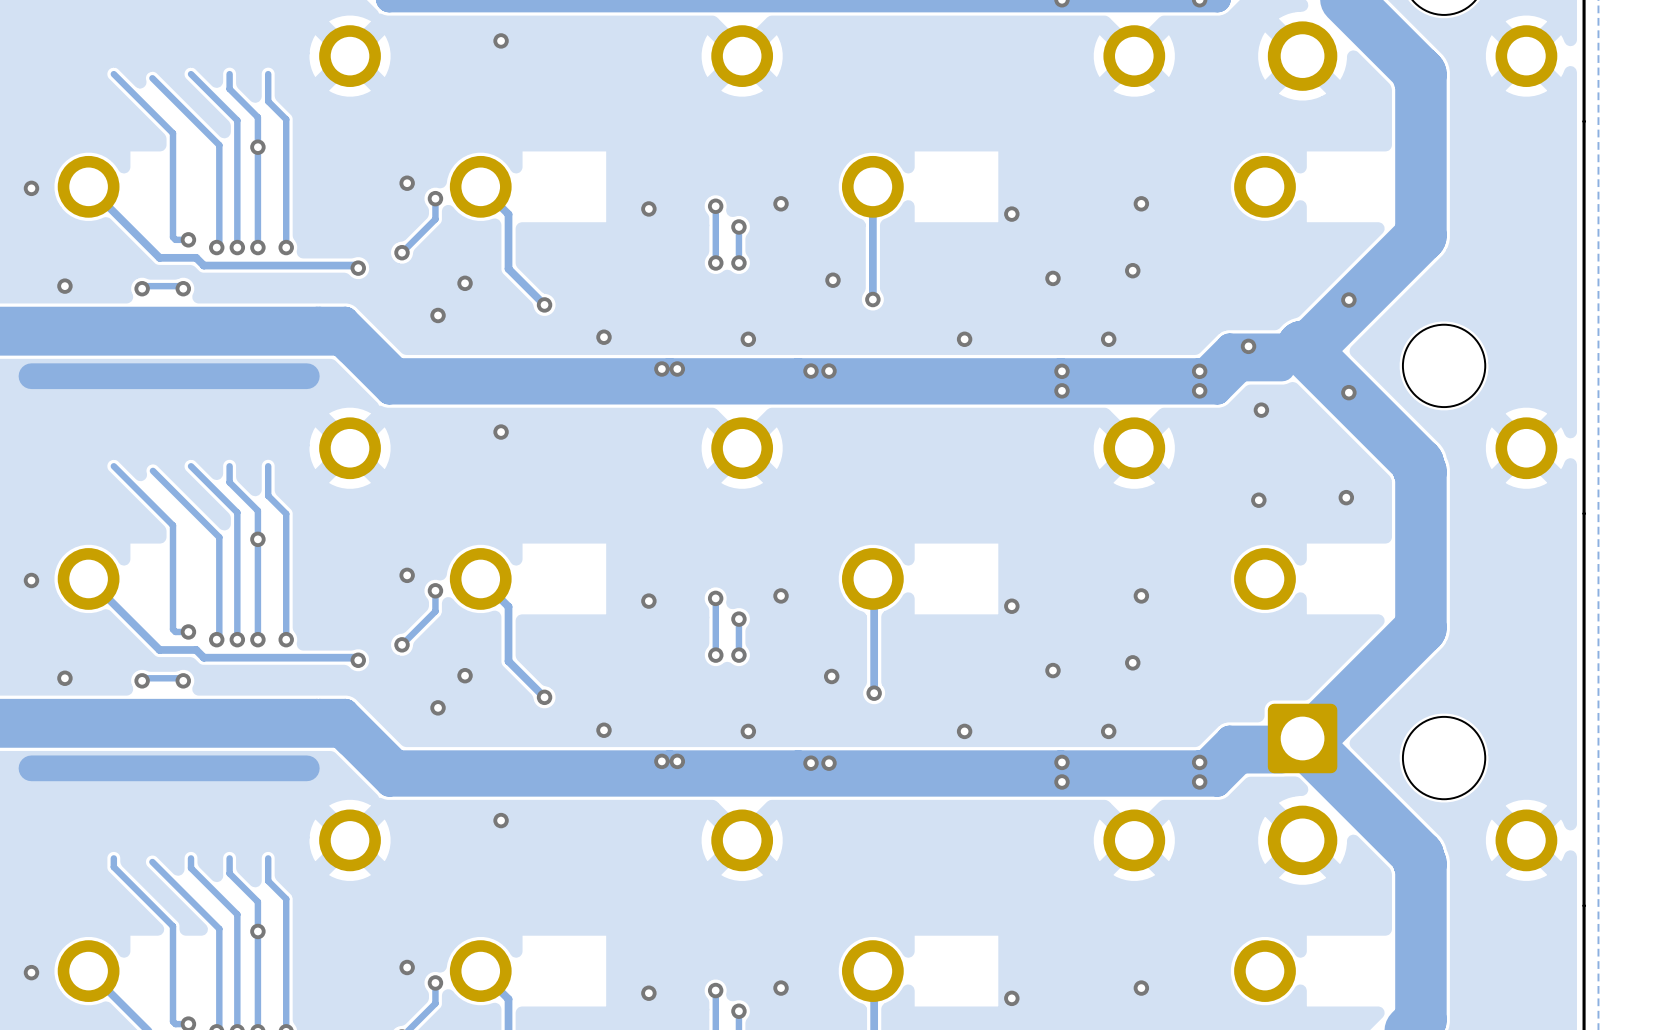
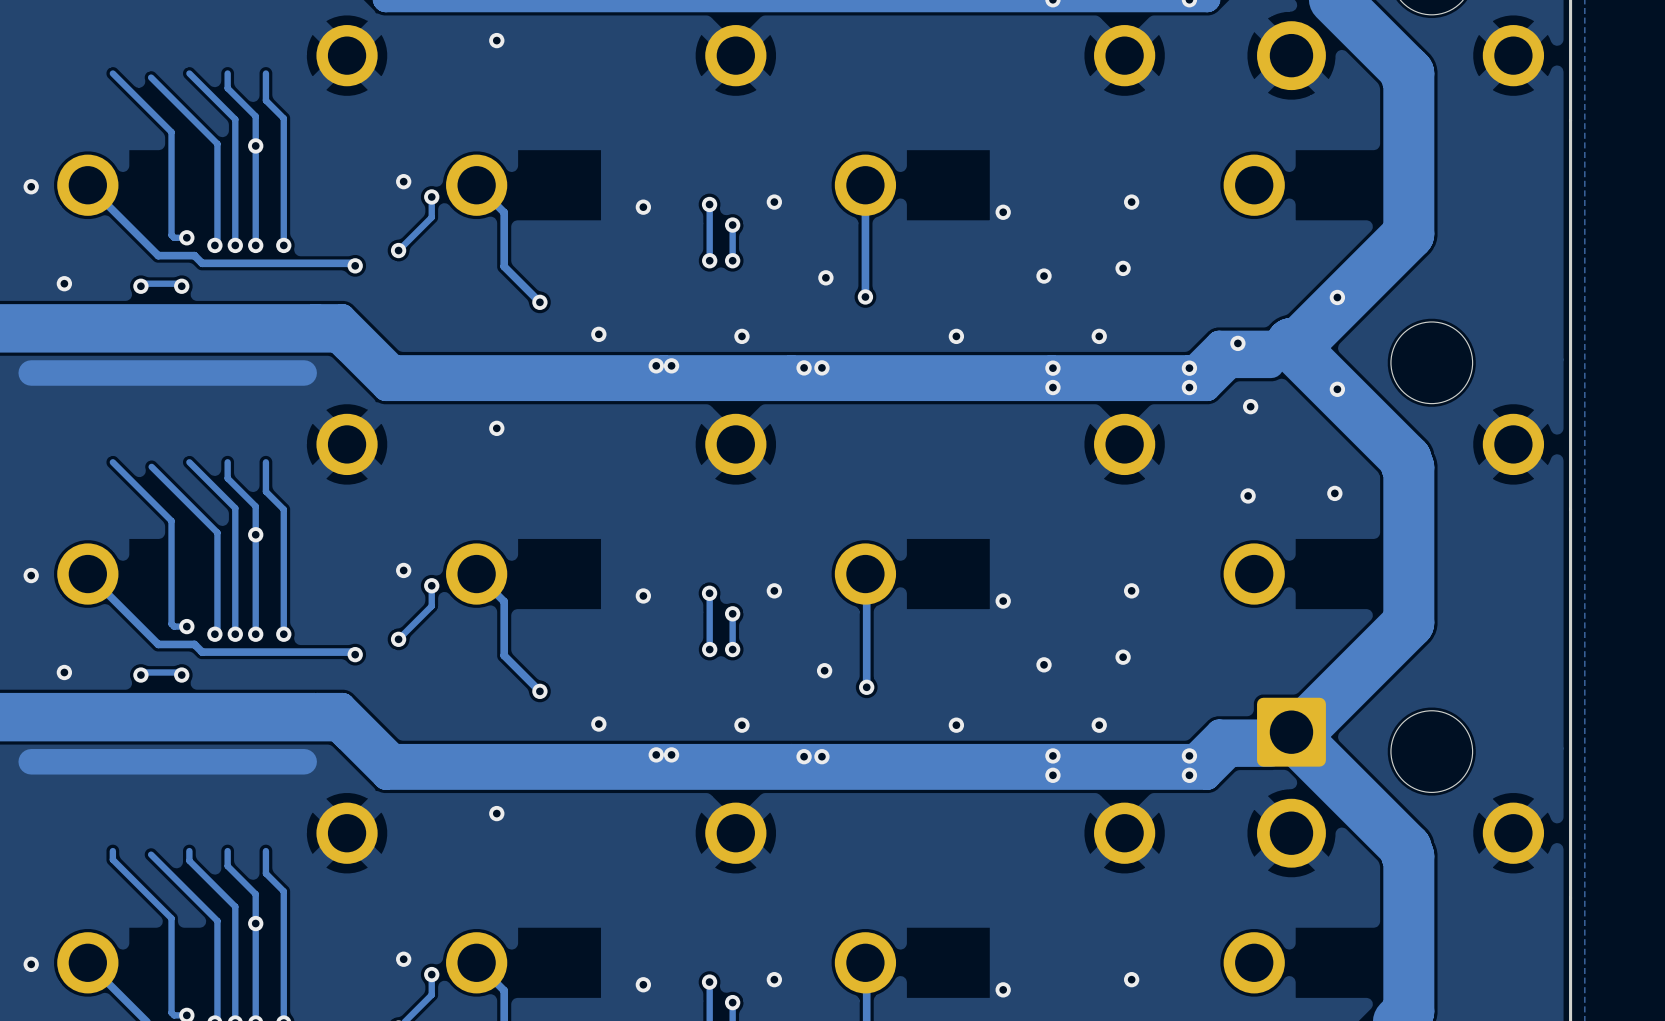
via: (465, 283) -> none
via: (438, 315) -> none
via: (465, 675) -> none
via: (438, 707) -> none

